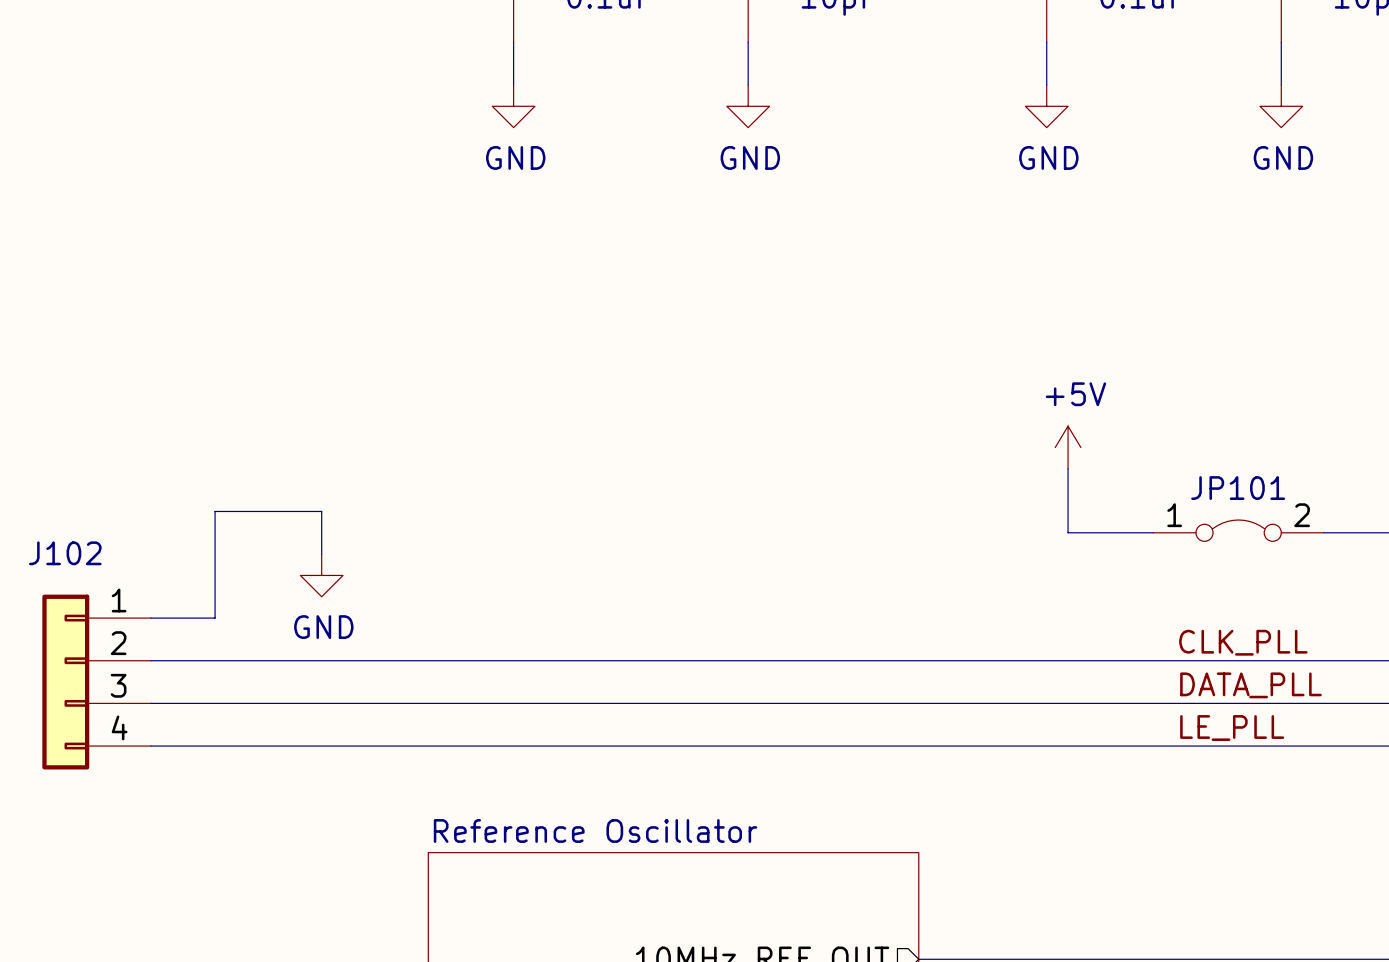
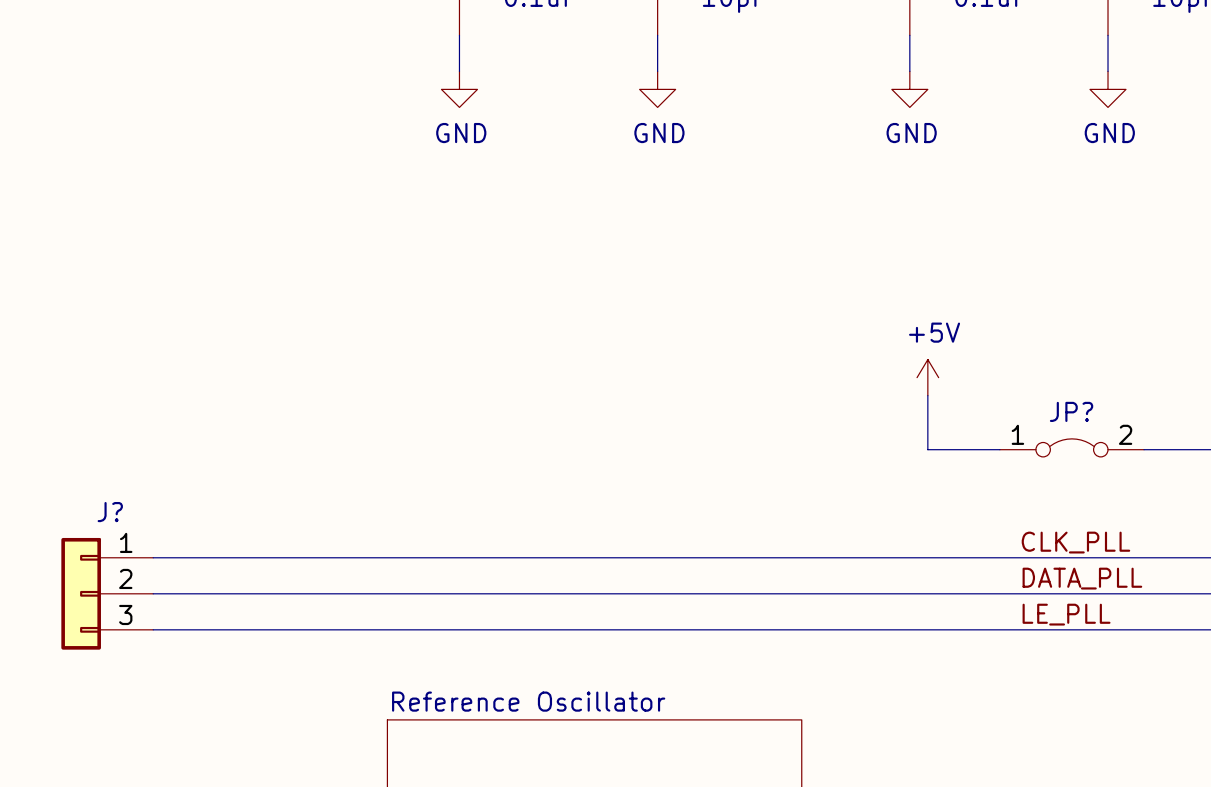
JP101 name: JP101 (1238, 488) -> JP? (1071, 411)
wire: (321, 554) (321, 511) (215, 511) (215, 618) (151, 618) -> none
power symbol: GND (321, 575) -> none
J102: (96, 682) -> none
J?: none -> (107, 593)

